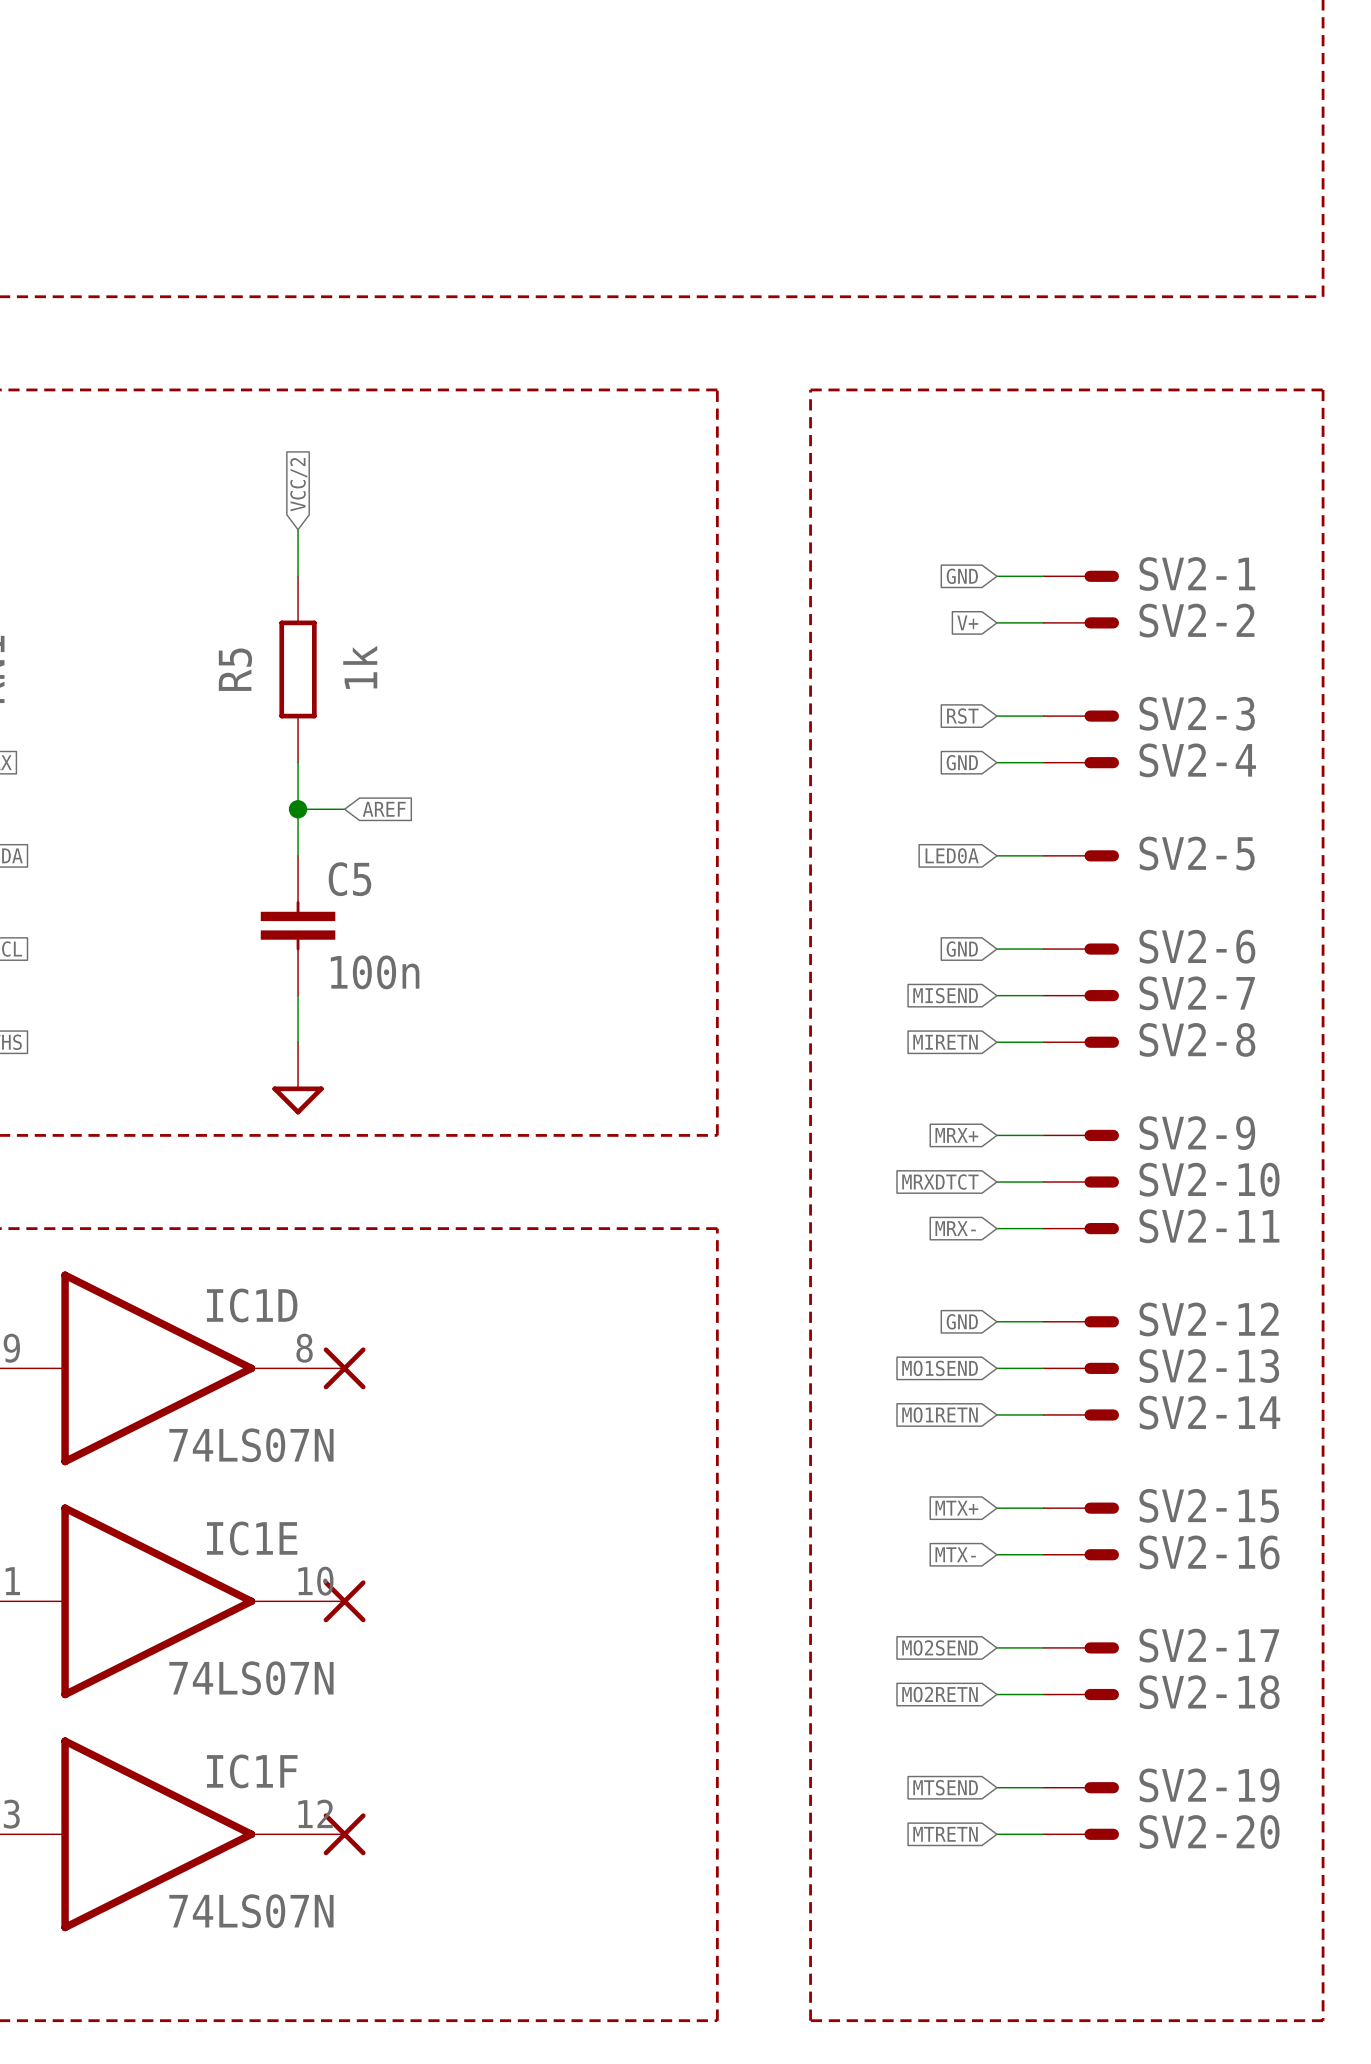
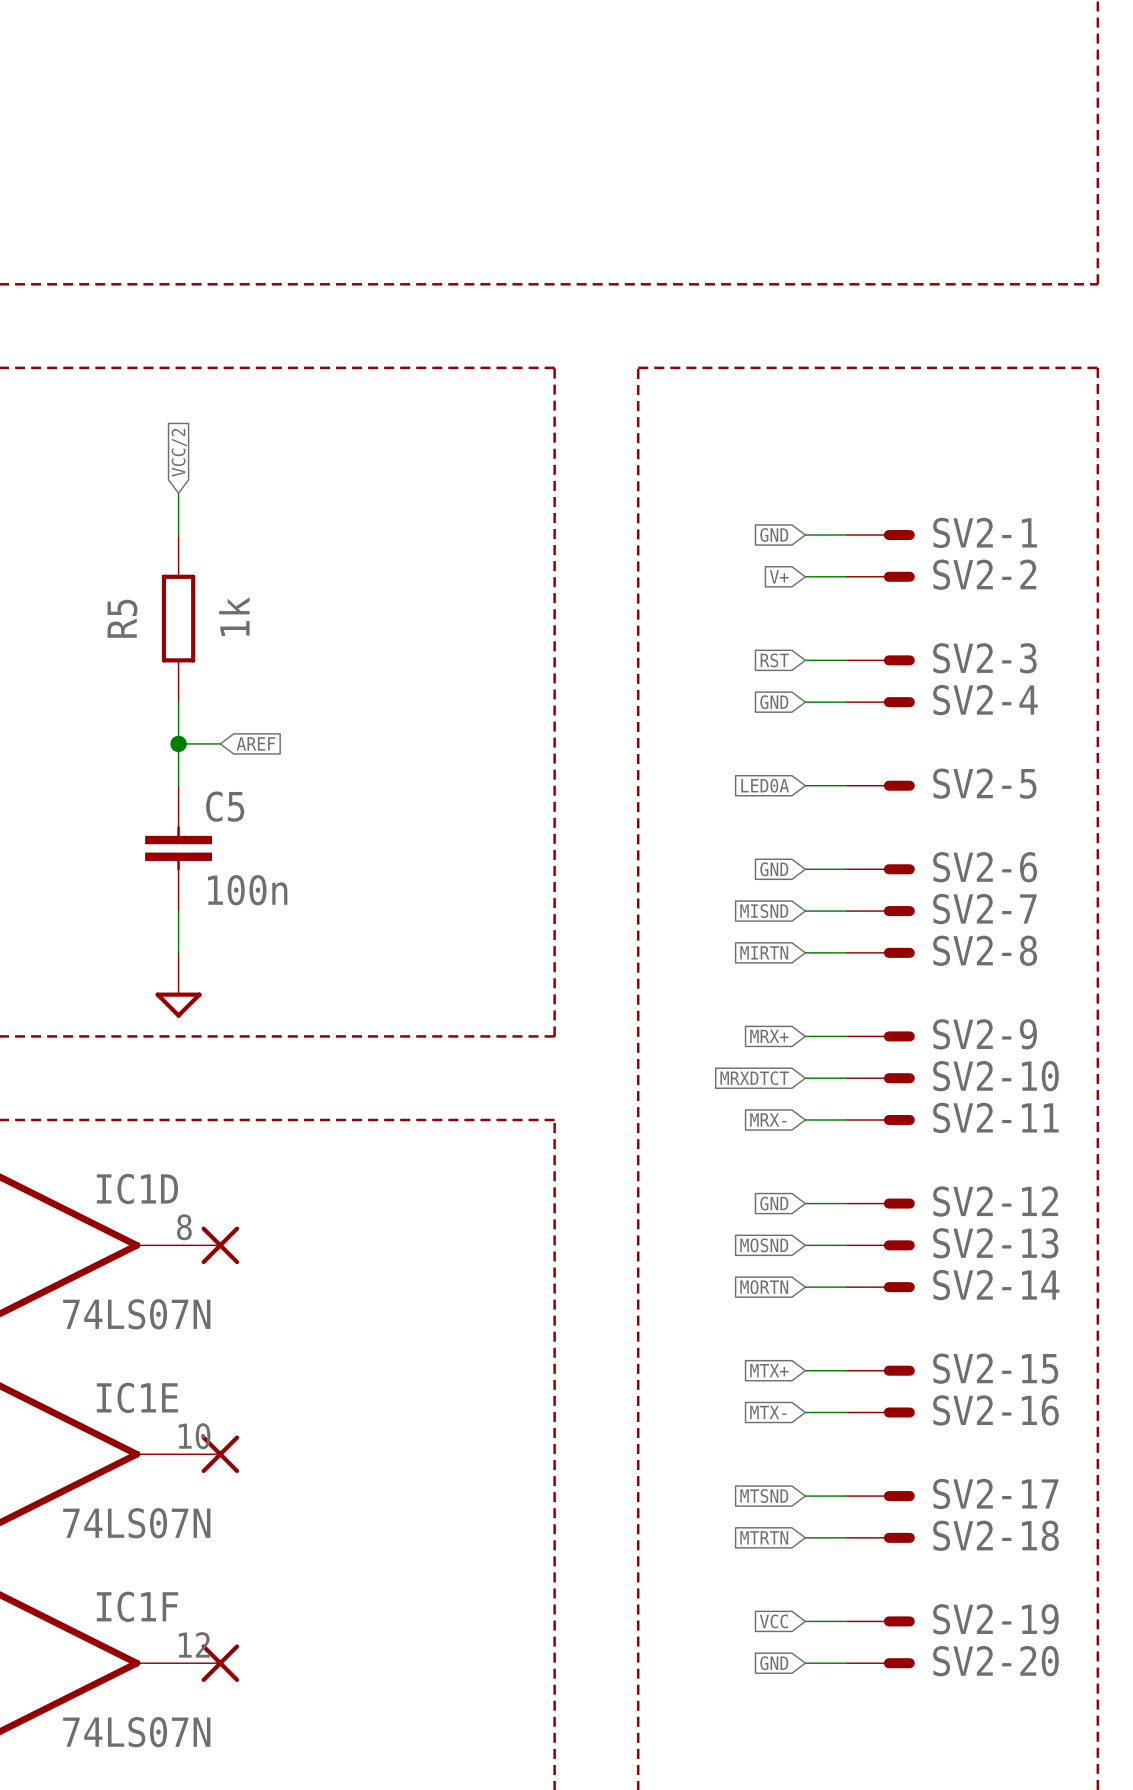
global label: MISEND (945, 995) -> MISND (764, 911)
global label: MIRETN (945, 1042) -> MIRTN (764, 952)
global label: MO1SEND (940, 1368) -> MOSND (764, 1245)
global label: MO1RETN (940, 1414) -> MORTN (764, 1287)
global label: MO2SEND (940, 1647) -> MTSND (764, 1496)
global label: MO2RETN (940, 1694) -> MTRTN (764, 1537)
global label: MTSEND (945, 1787) -> VCC (773, 1621)
global label: MTRETN (945, 1834) -> GND (774, 1663)

